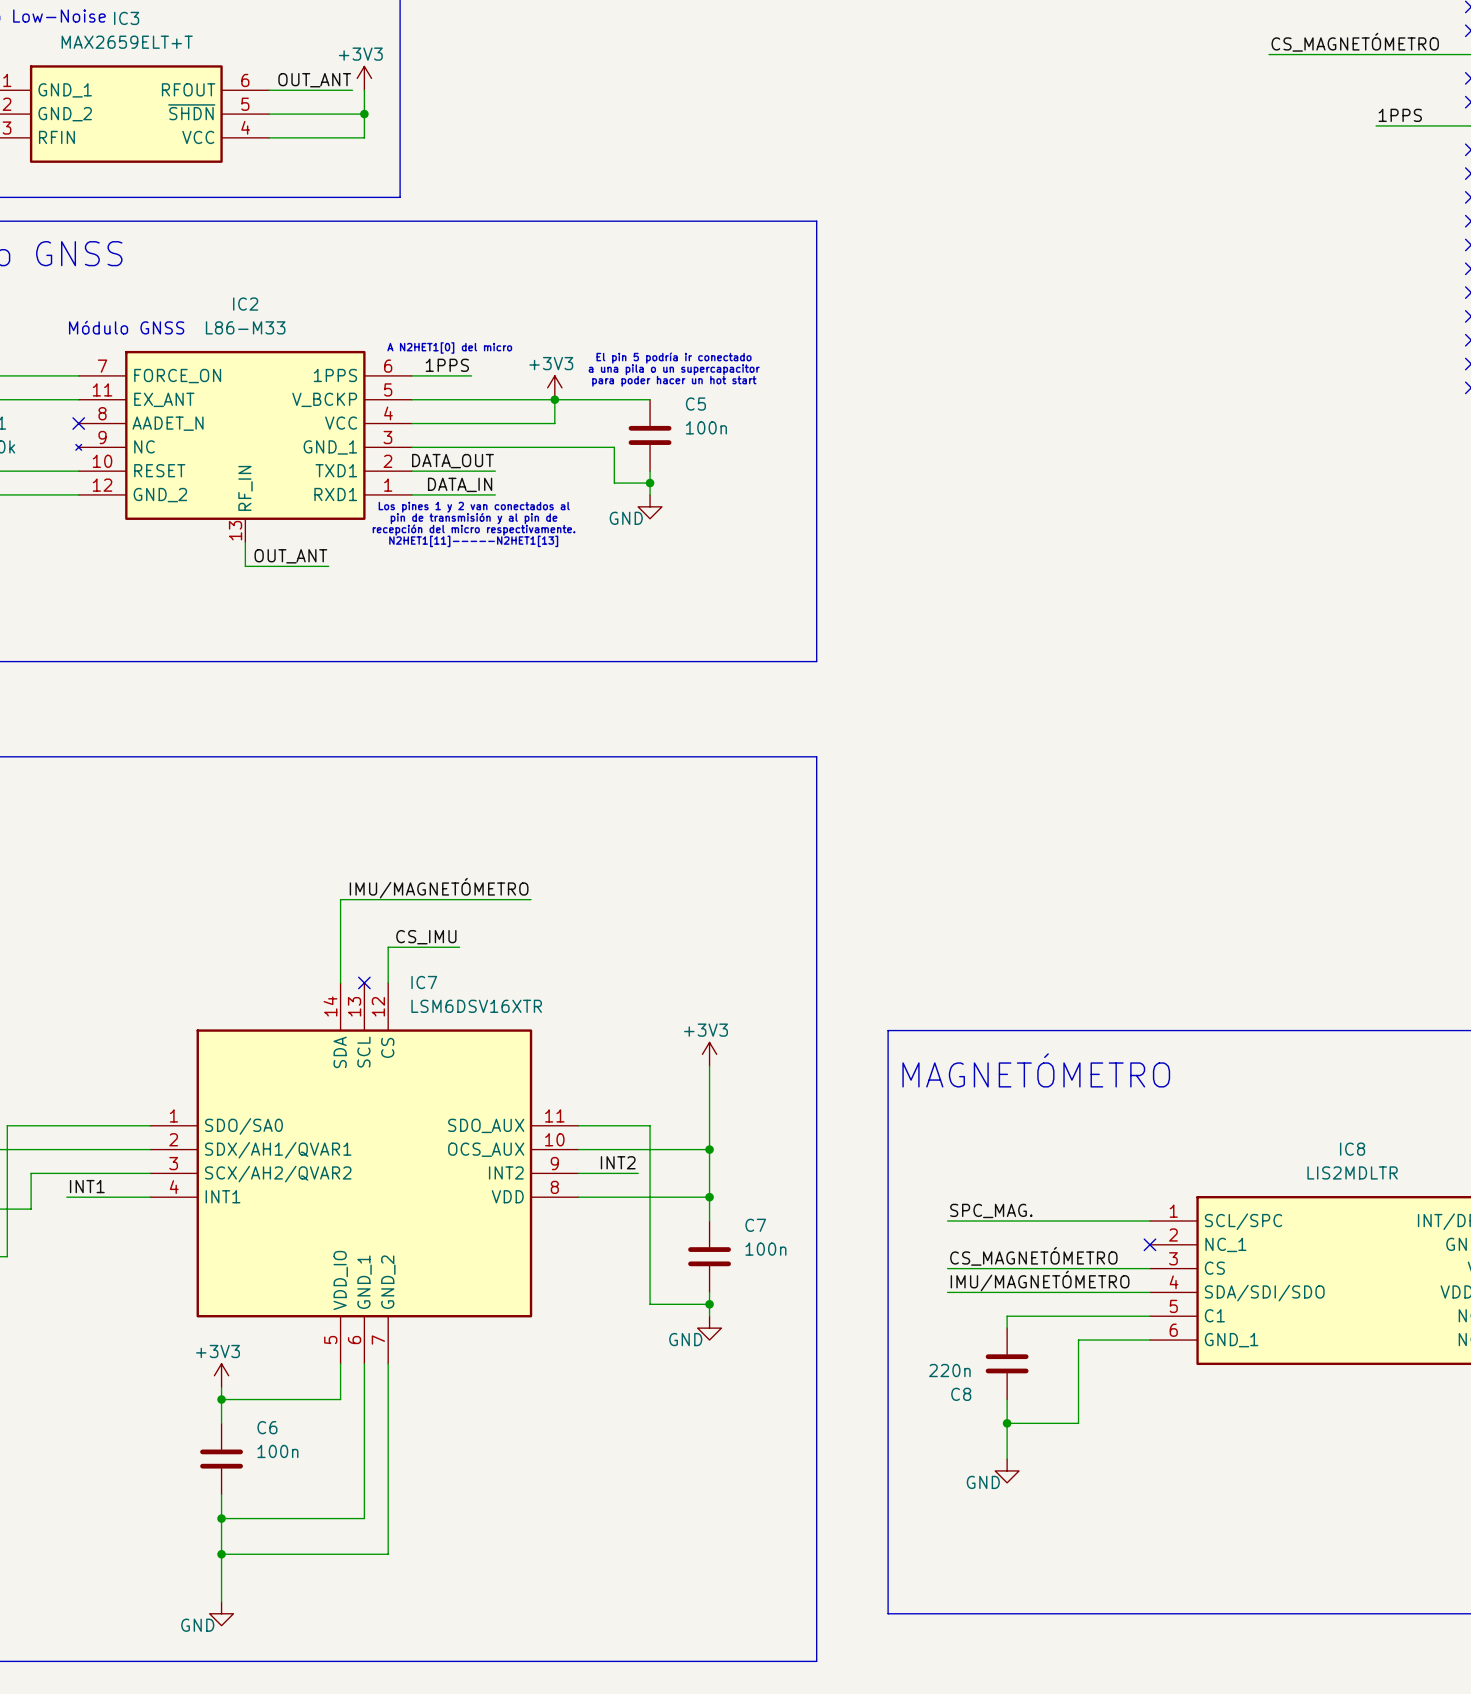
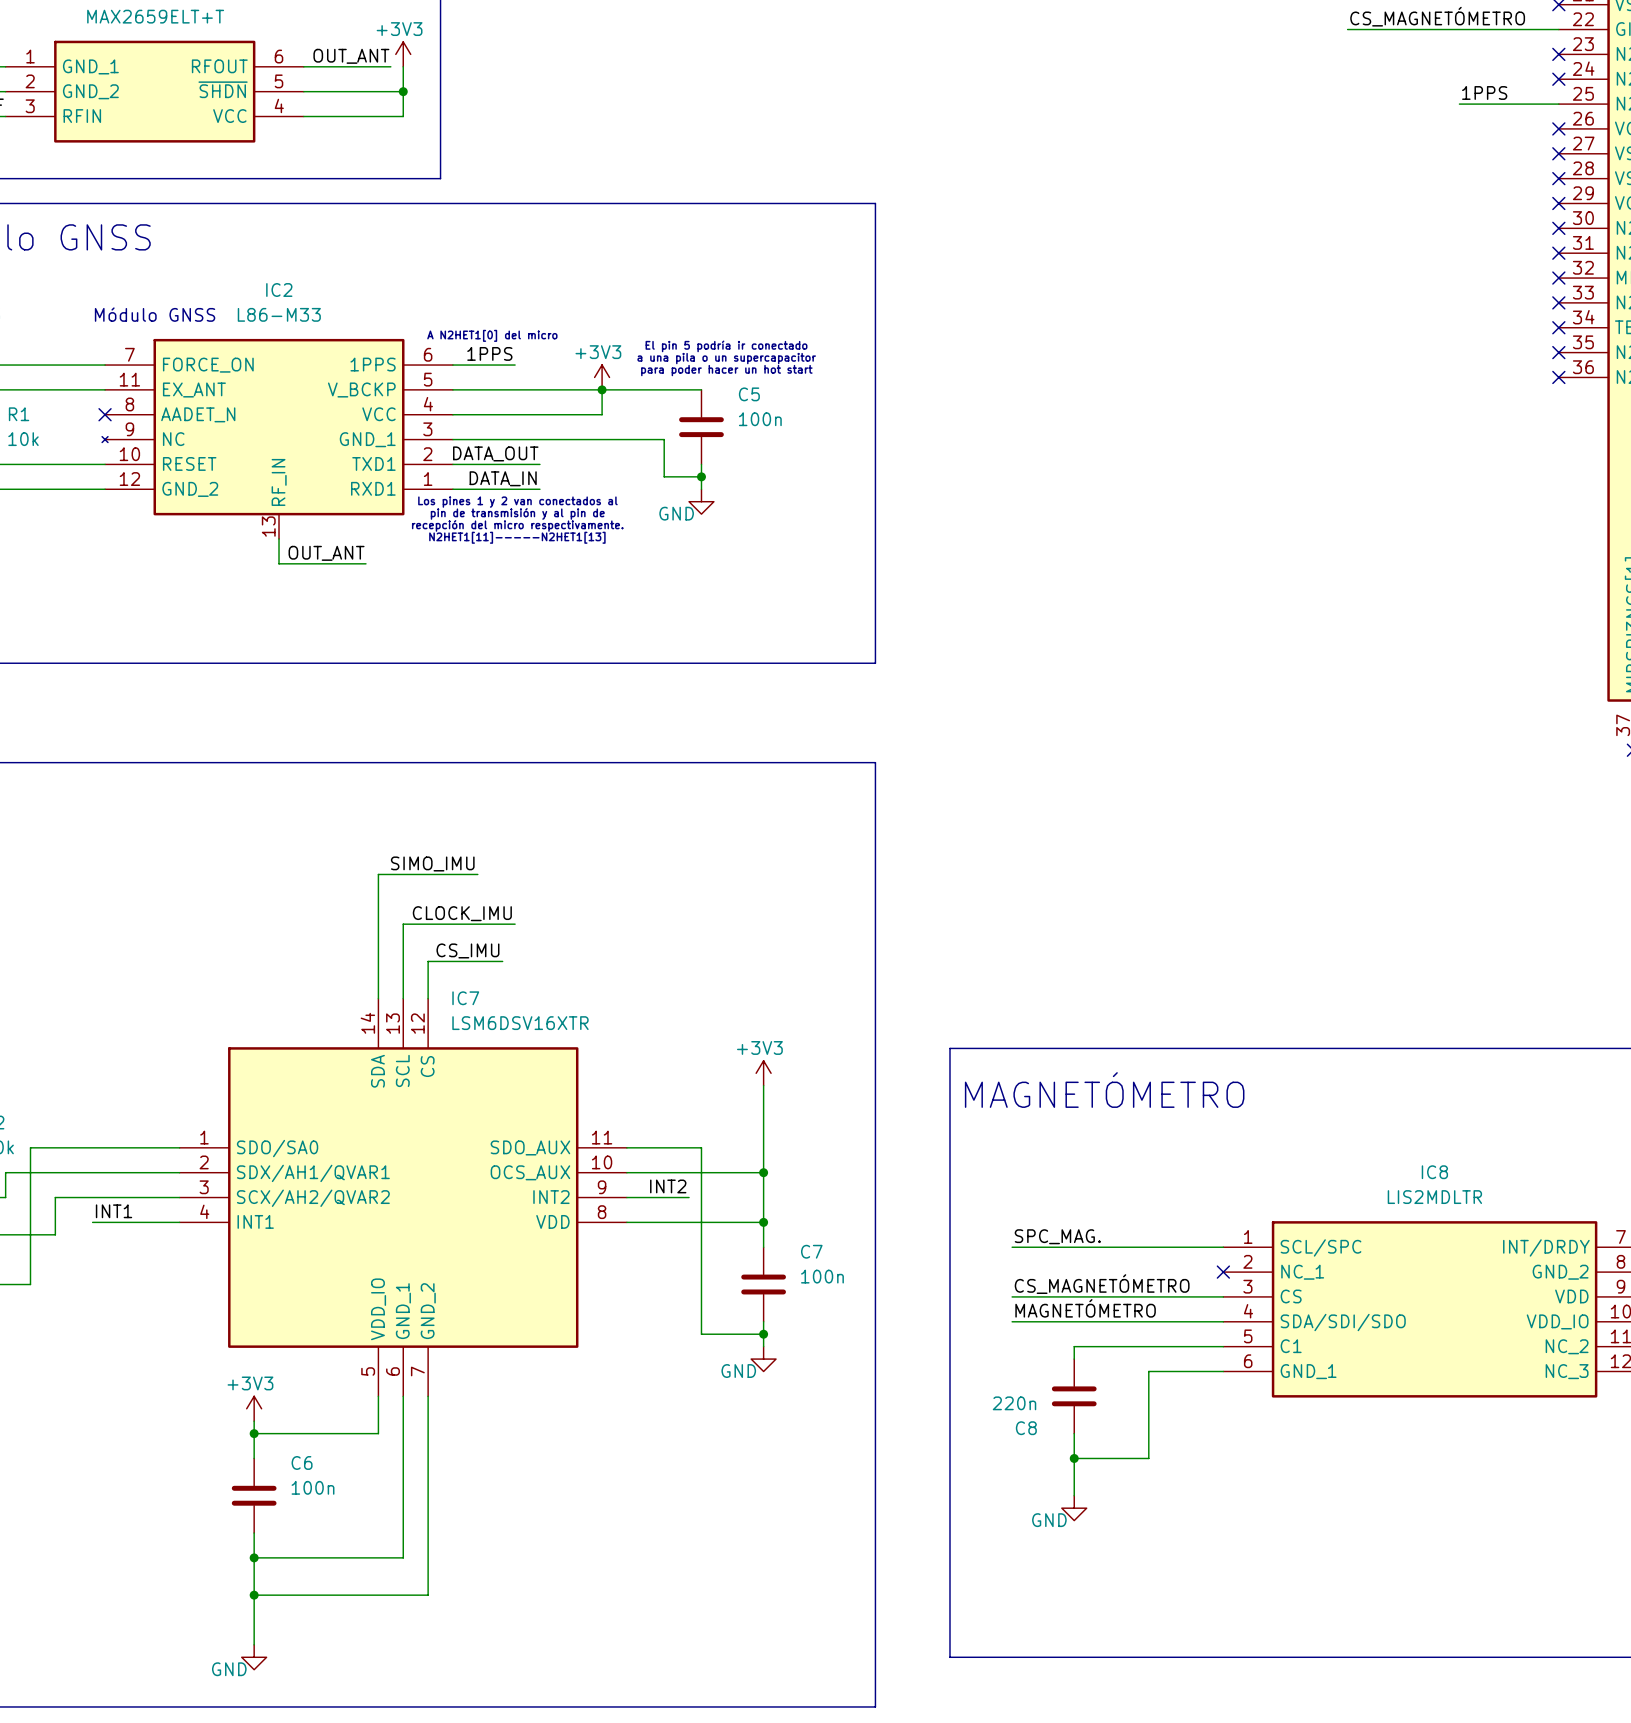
label: none -> SIMO_IMU (432, 863)
label: IMU/MAGNETÓMETRO (439, 888) -> none
wire: (340, 899) (531, 899) -> (378, 911) (378, 874) (477, 874)
label: none -> CLOCK_IMU (462, 913)
wire: none -> (515, 924) (403, 924) (403, 998)
no-connect mark: (364, 982) -> none
label: IMU/MAGNETÓMETRO (1040, 1280) -> MAGNETÓMETRO (1085, 1308)

